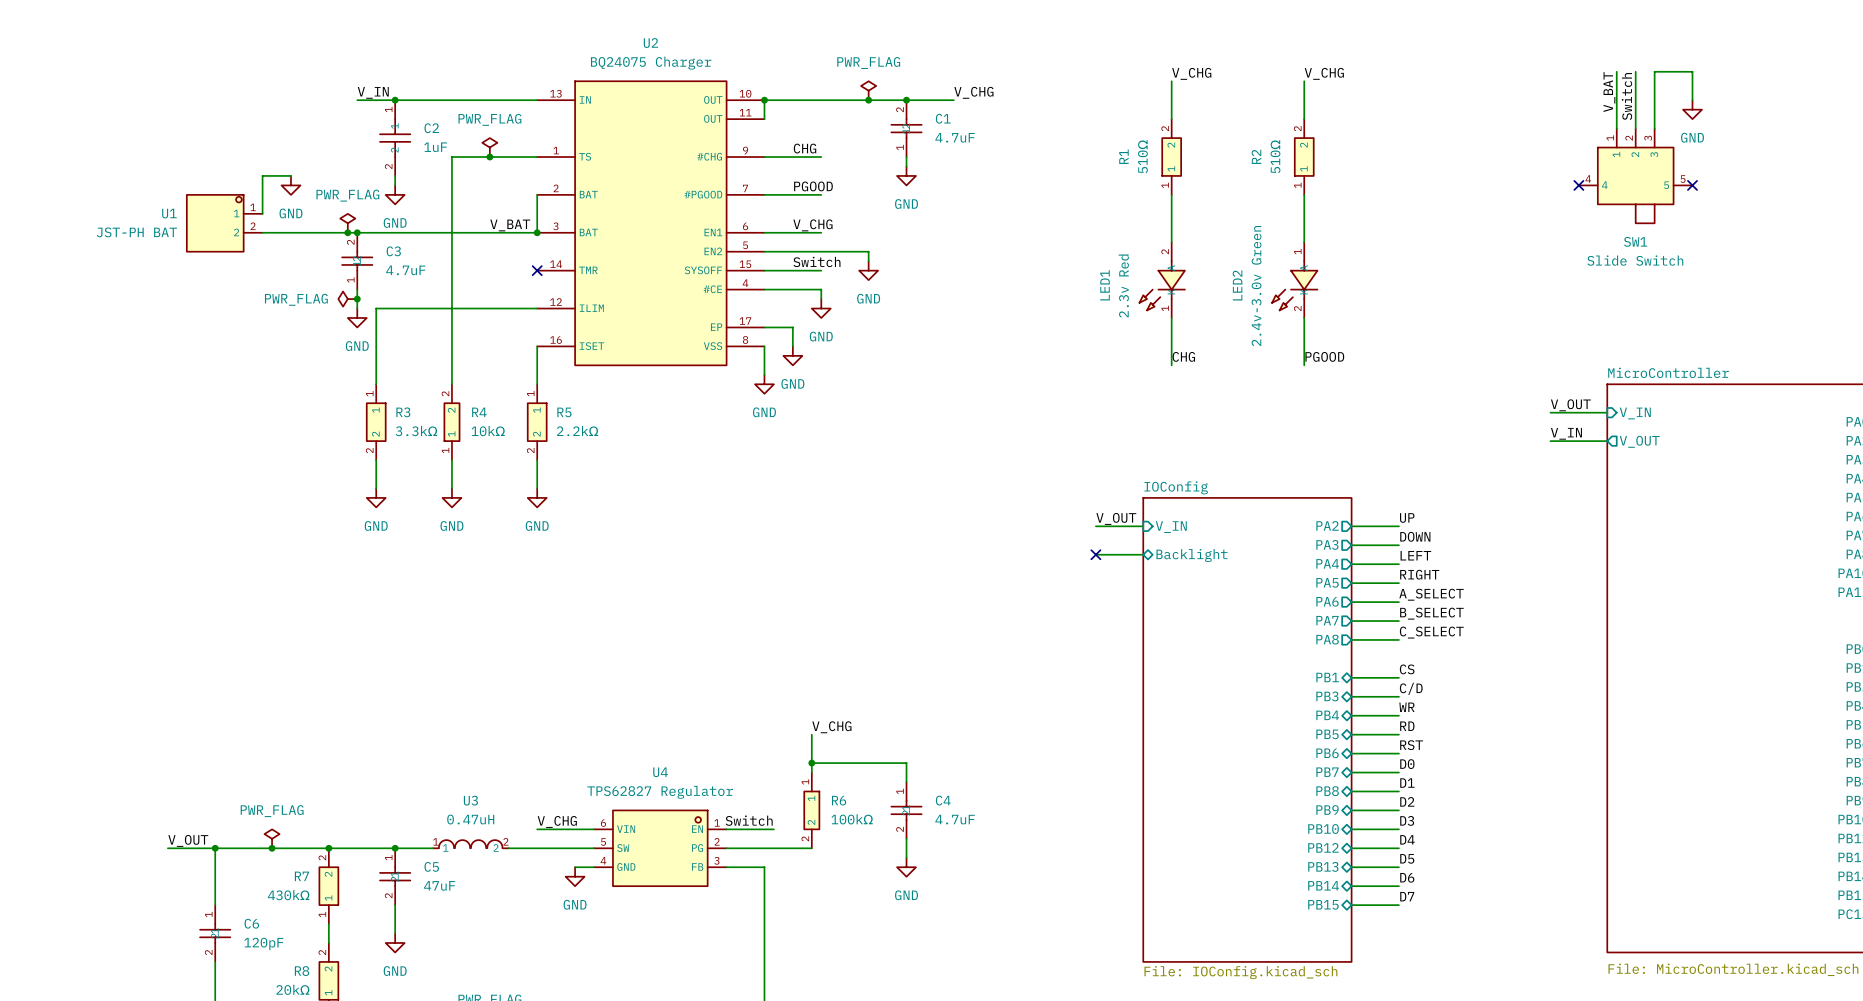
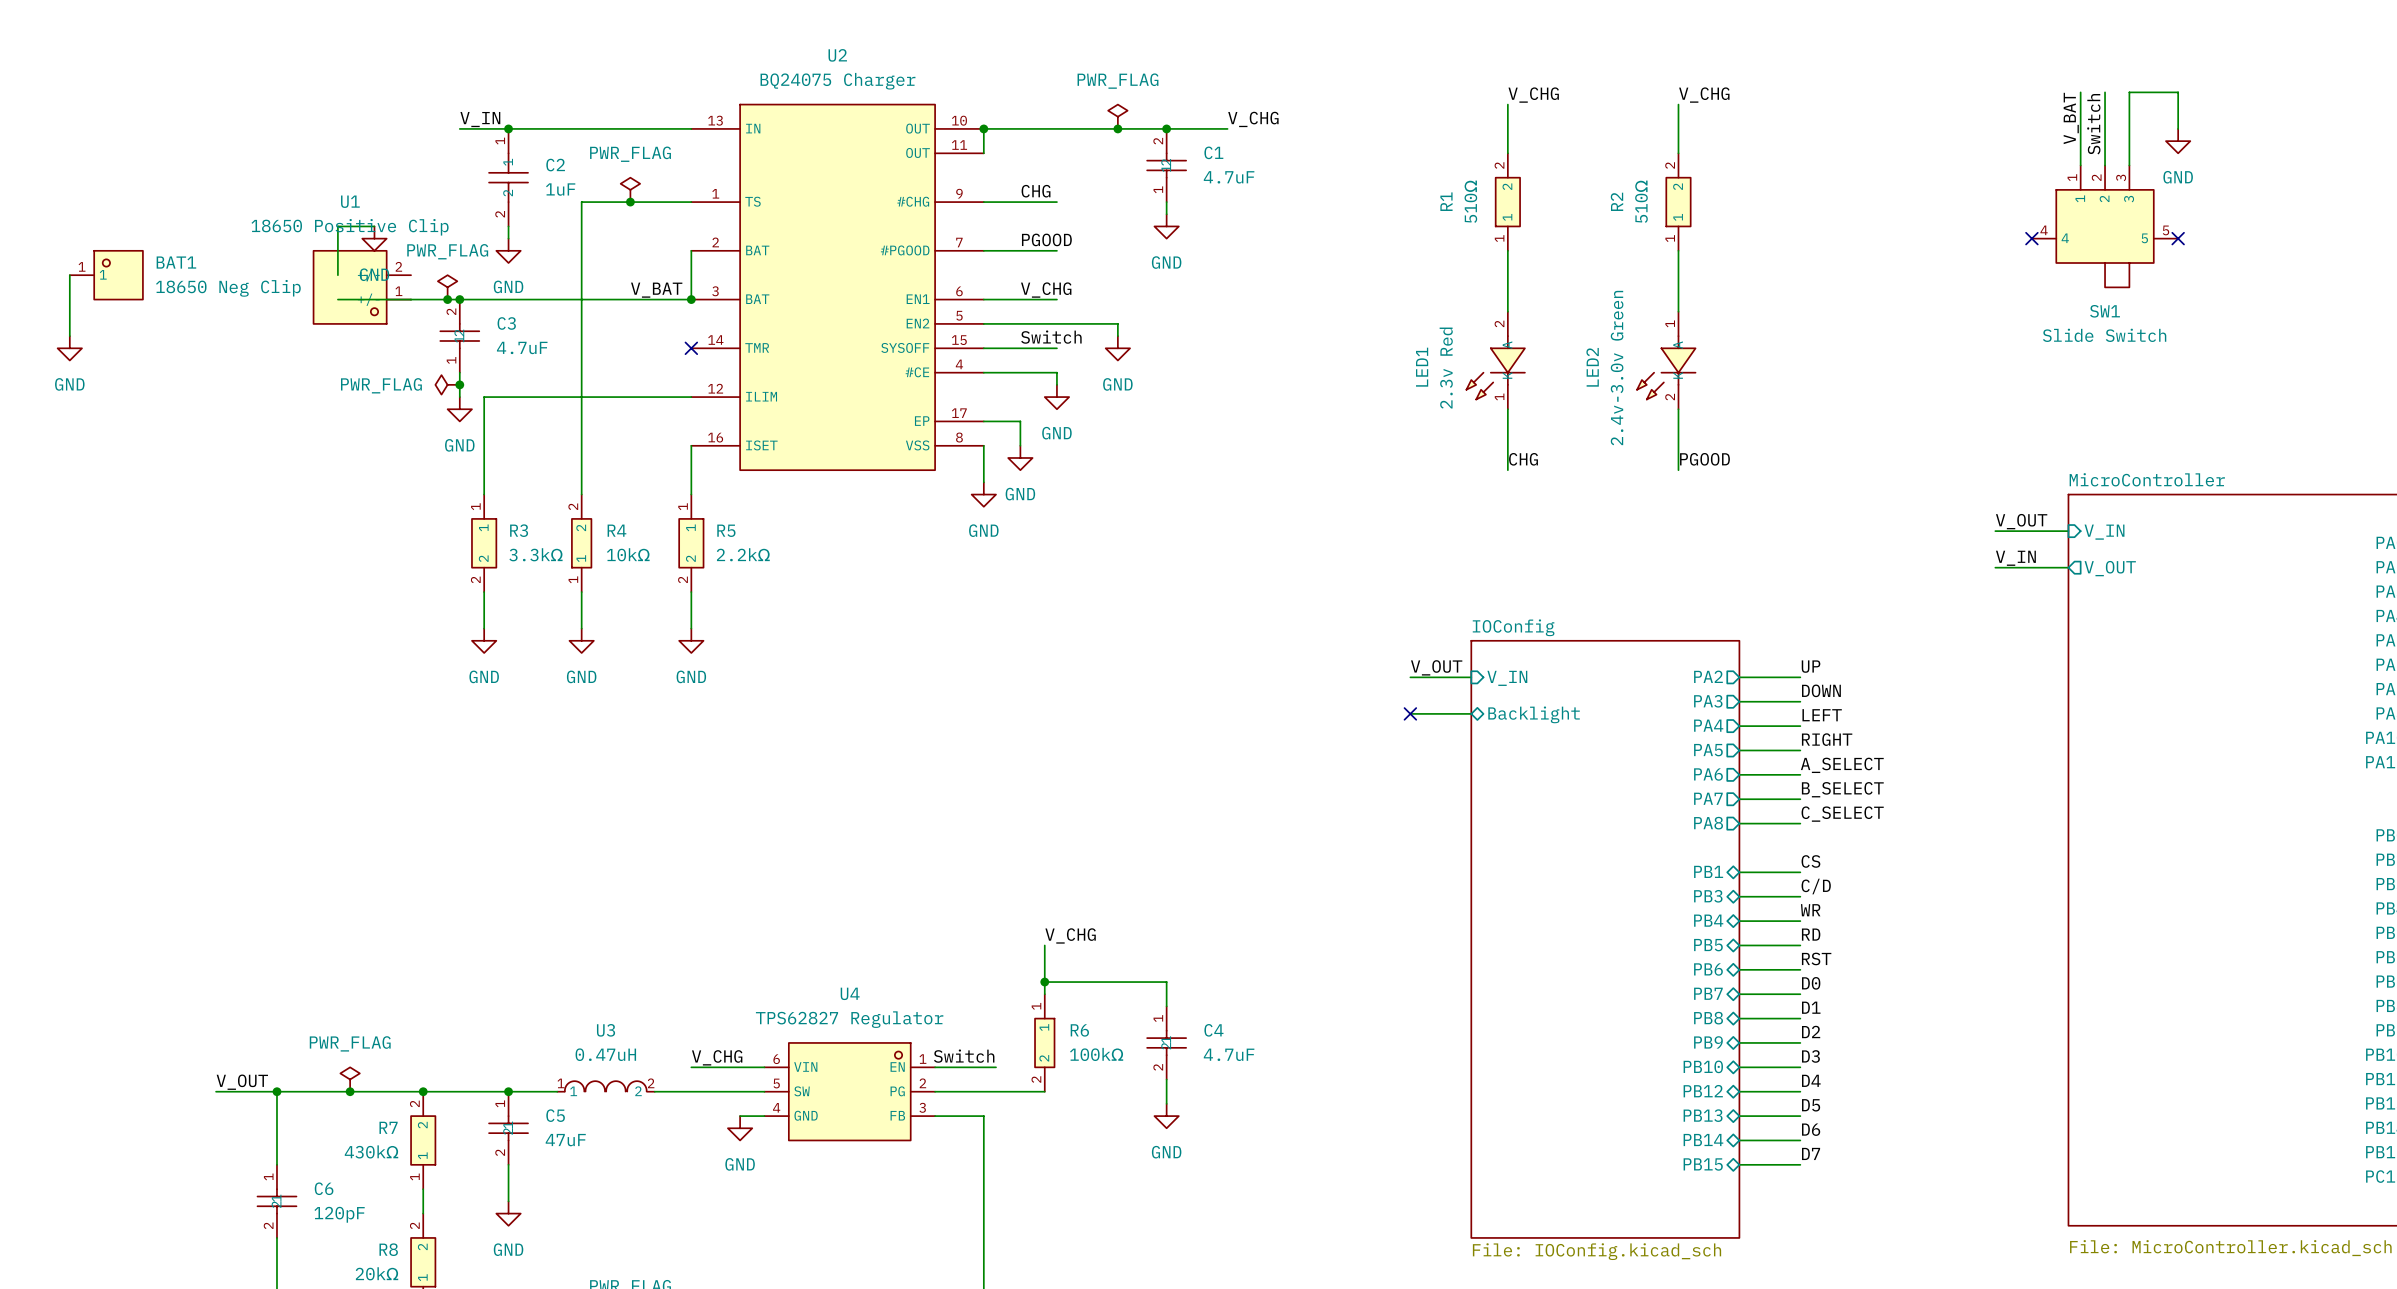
U1 symbol: [186, 194, 263, 252] -> [313, 250, 412, 324]
wire: none -> (69, 275) (69, 336)
BAT1: none -> 18650 Neg Clip (106, 275)
U1 name position: U1 (169, 213) -> U1 (350, 201)
U1 value: JST-PH BAT (136, 232) -> 18650 Positive Clip (350, 227)
power symbol: none -> GND (69, 348)

